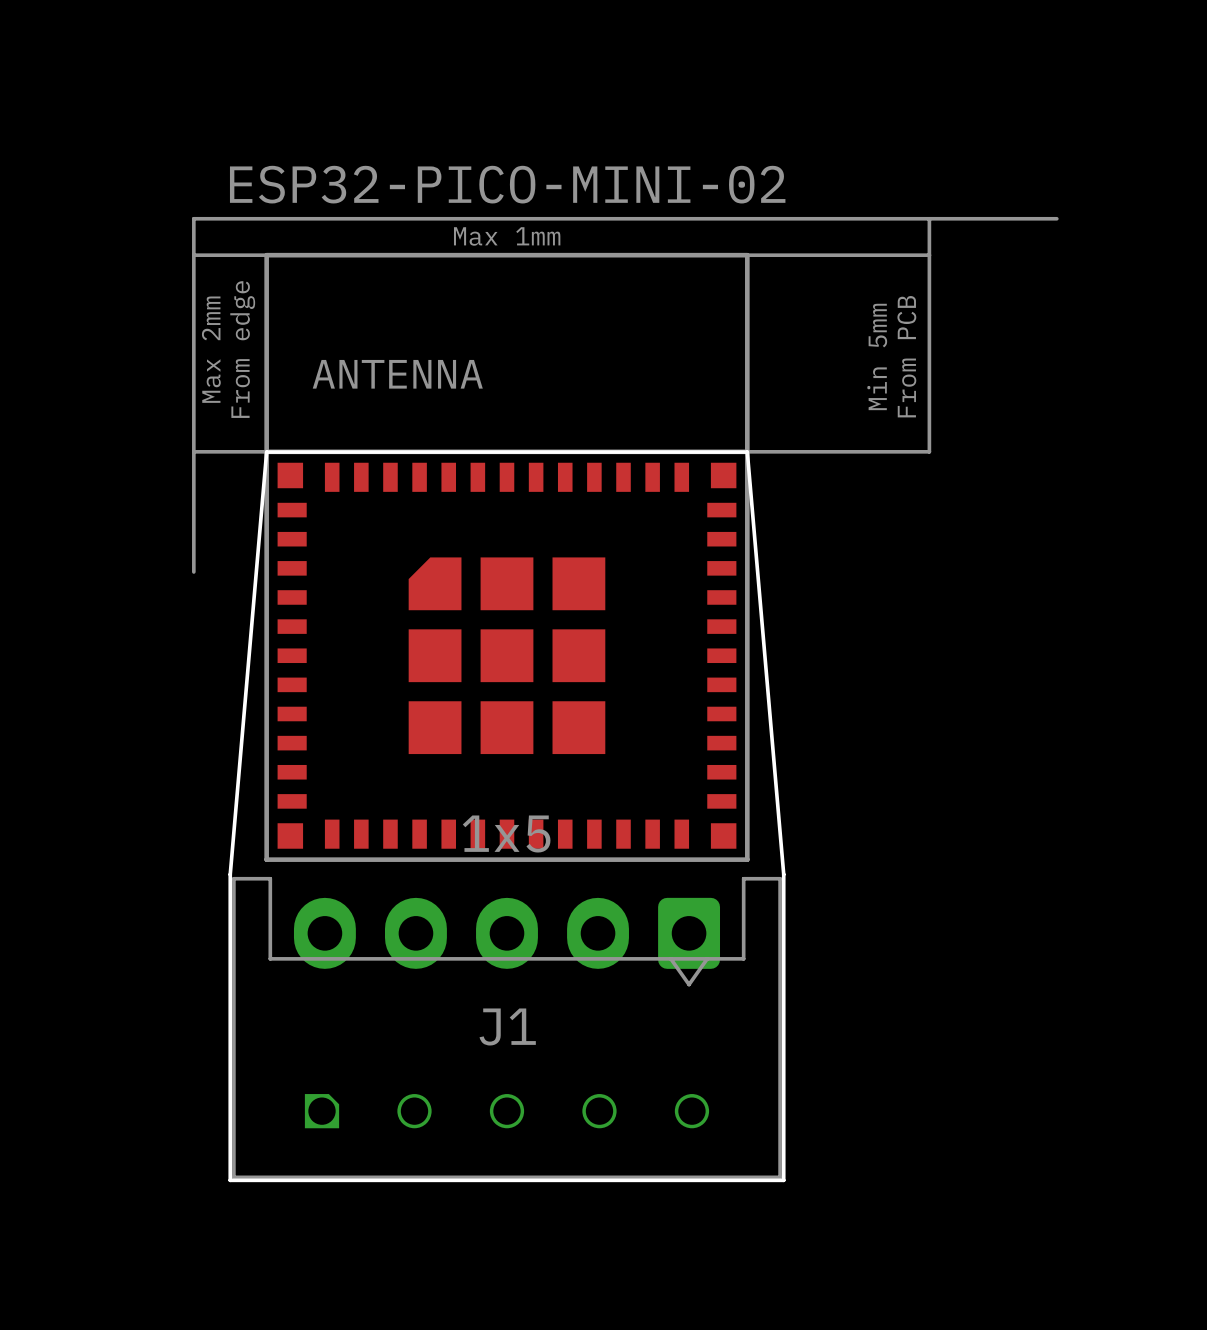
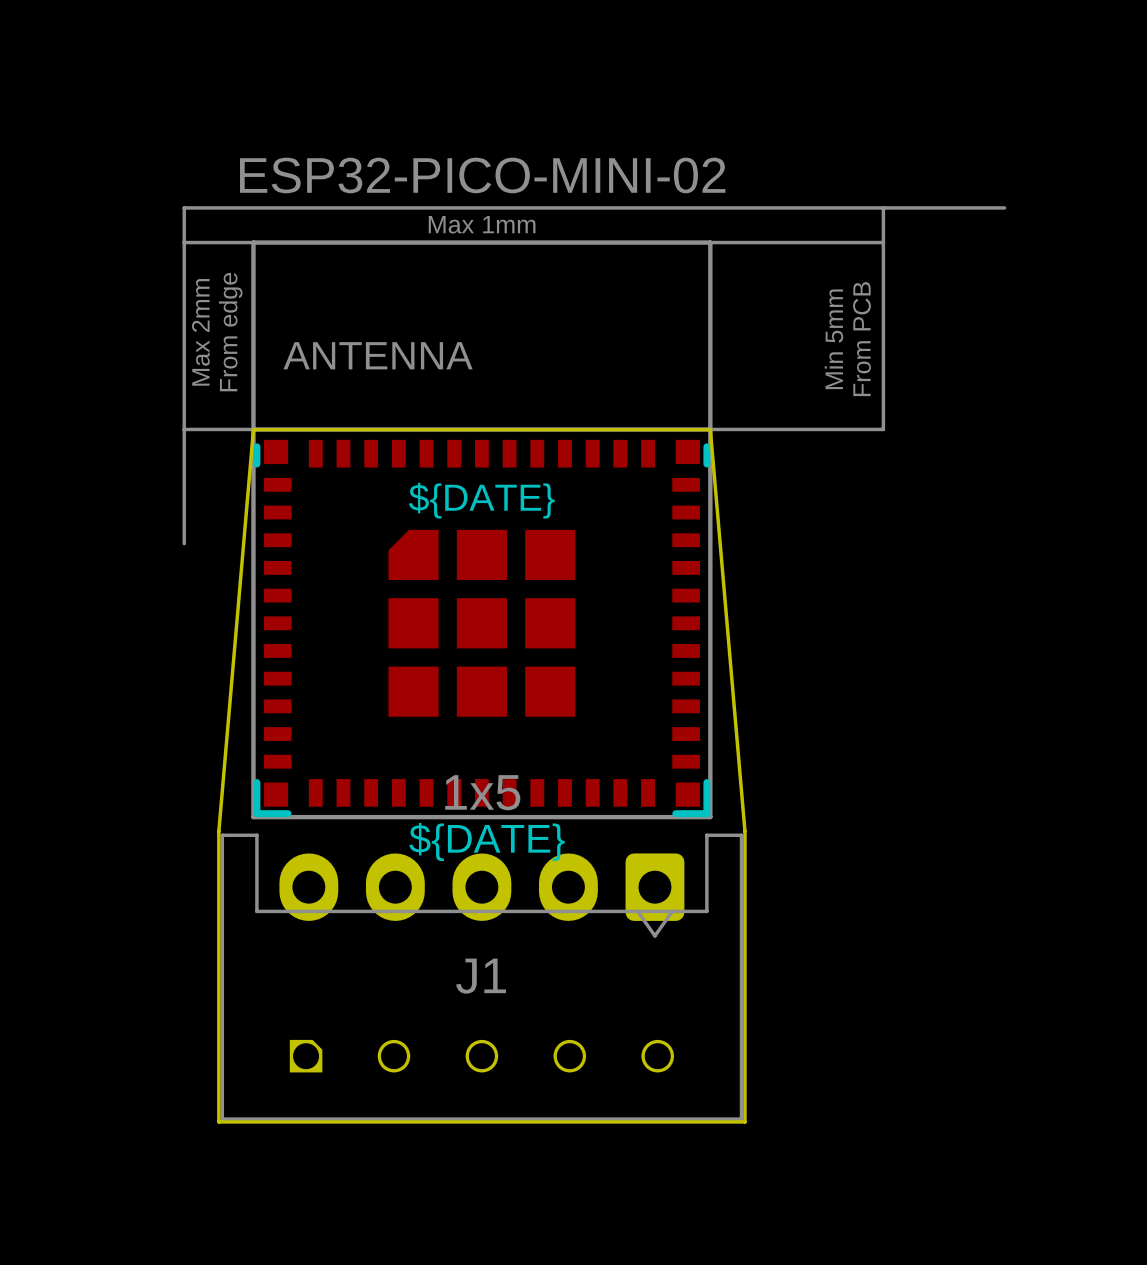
part footprint: [192, 216, 1059, 862] -> [182, 206, 1007, 820]
text: none -> ${DATE} (486, 841)

